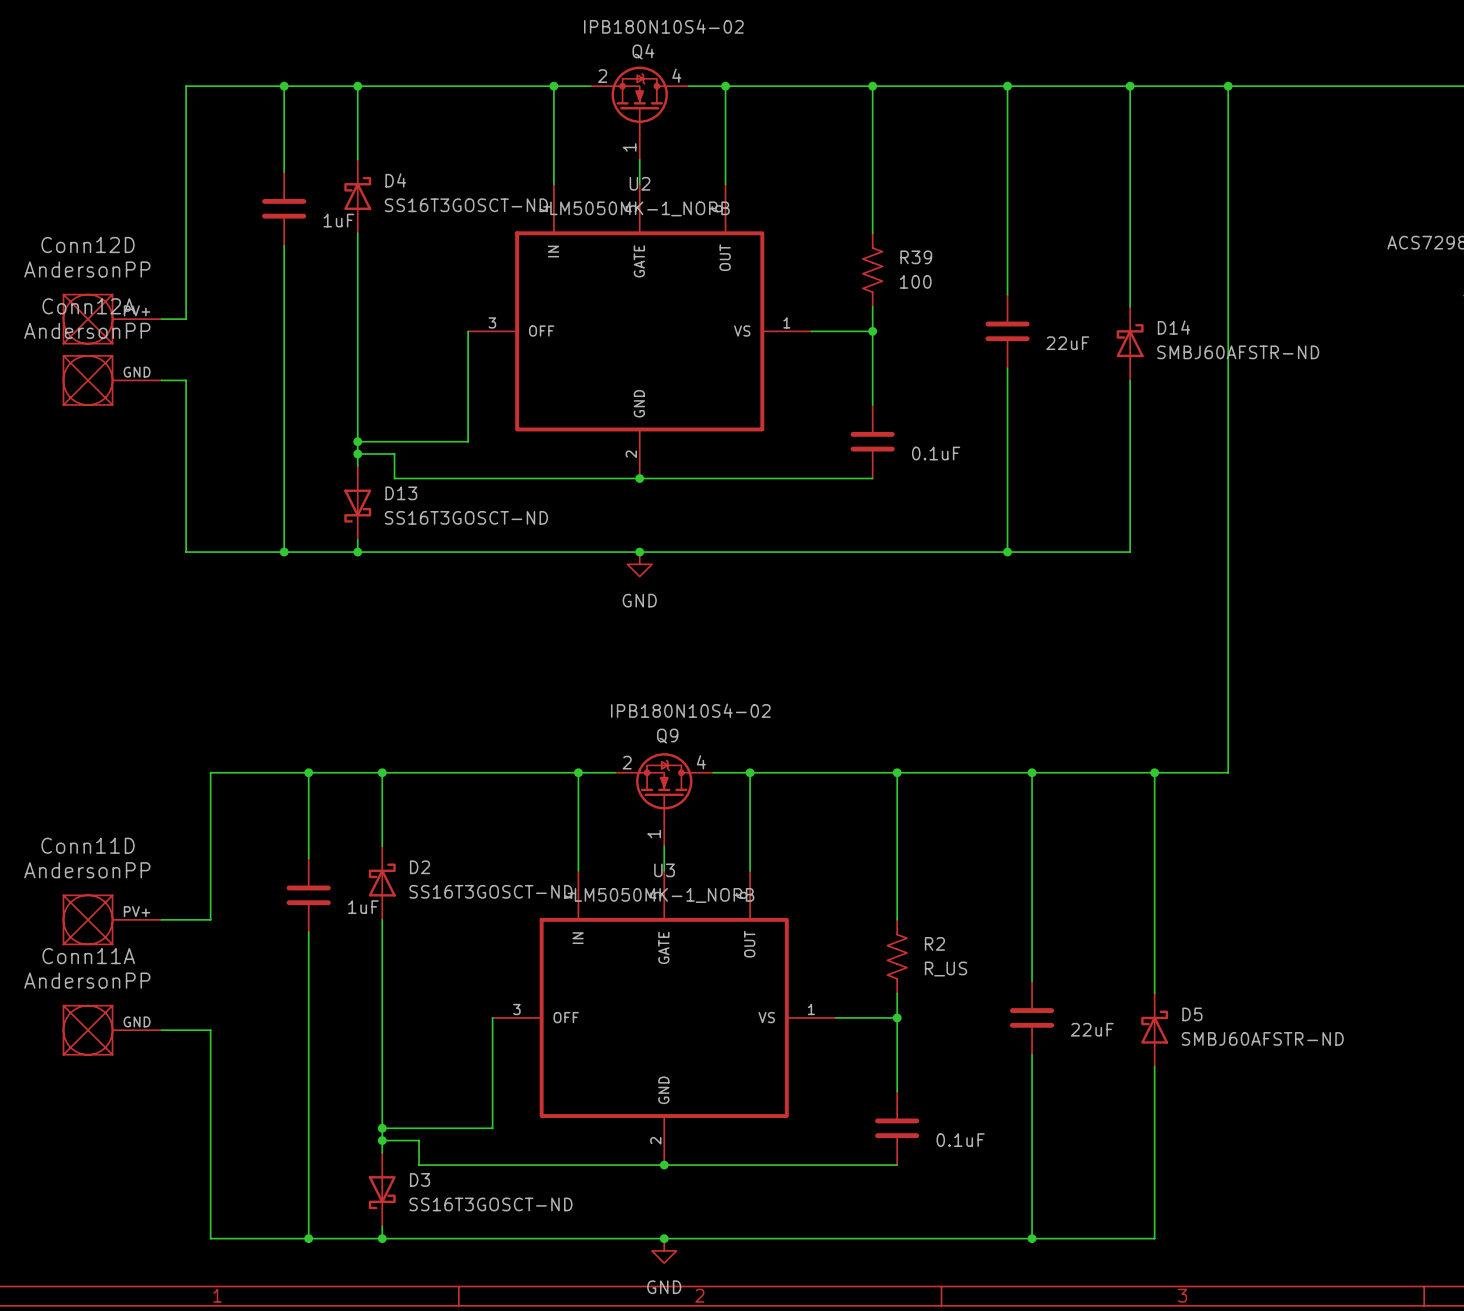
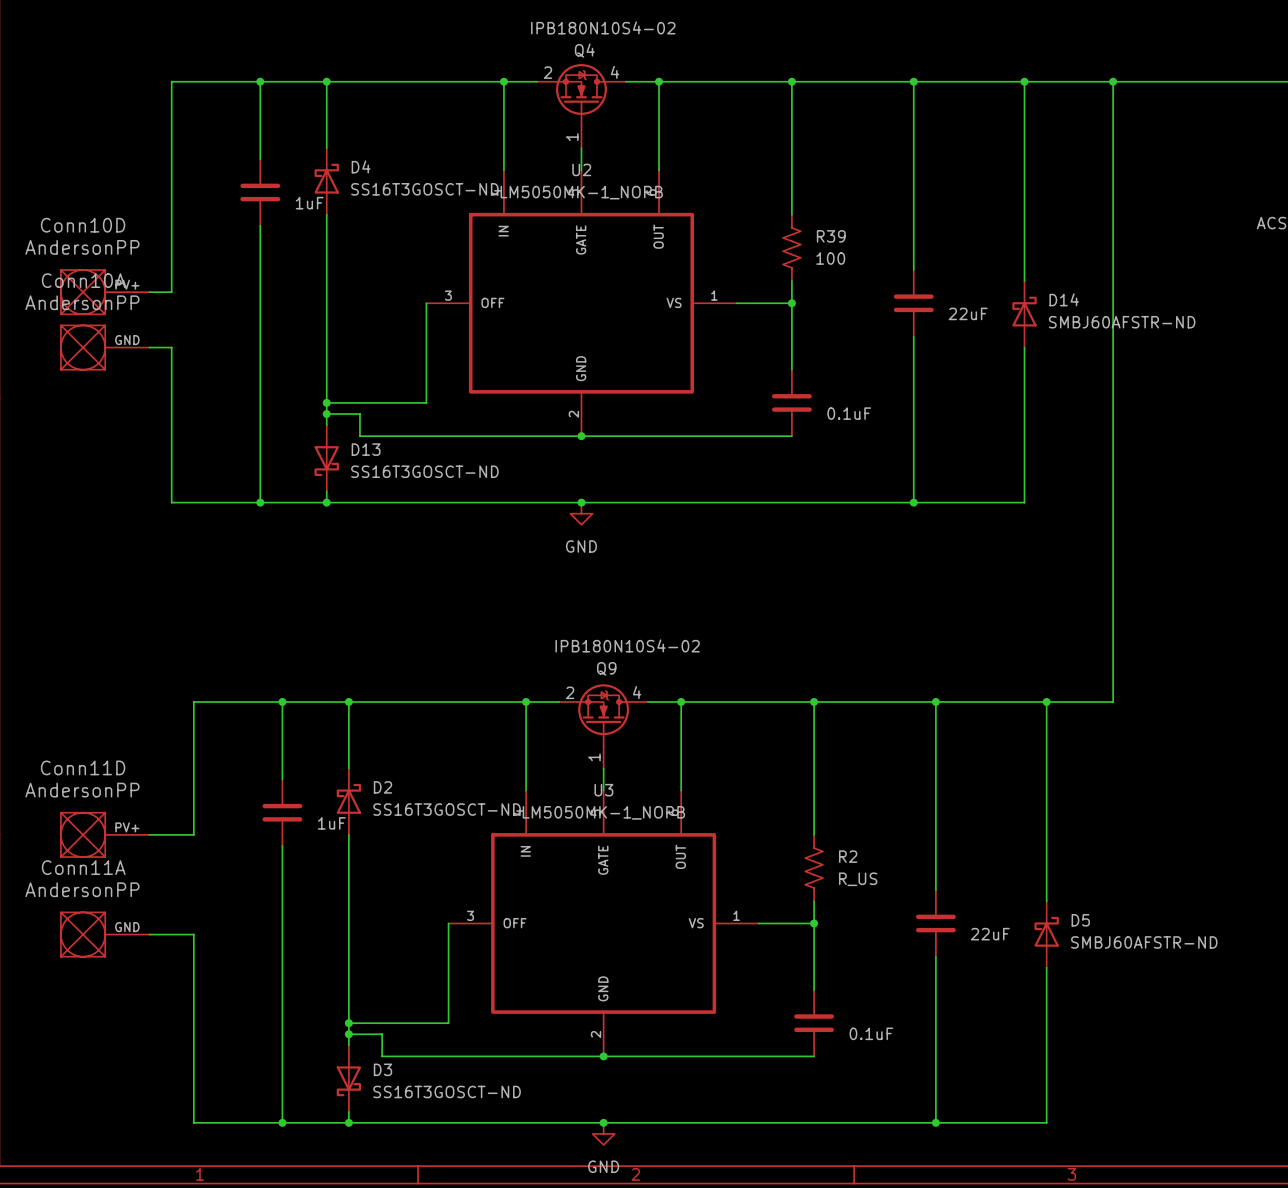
Conn12D name: Conn12D (88, 245) -> Conn10D (83, 225)
Conn12A name: Conn12A (88, 306) -> Conn10A (83, 280)

